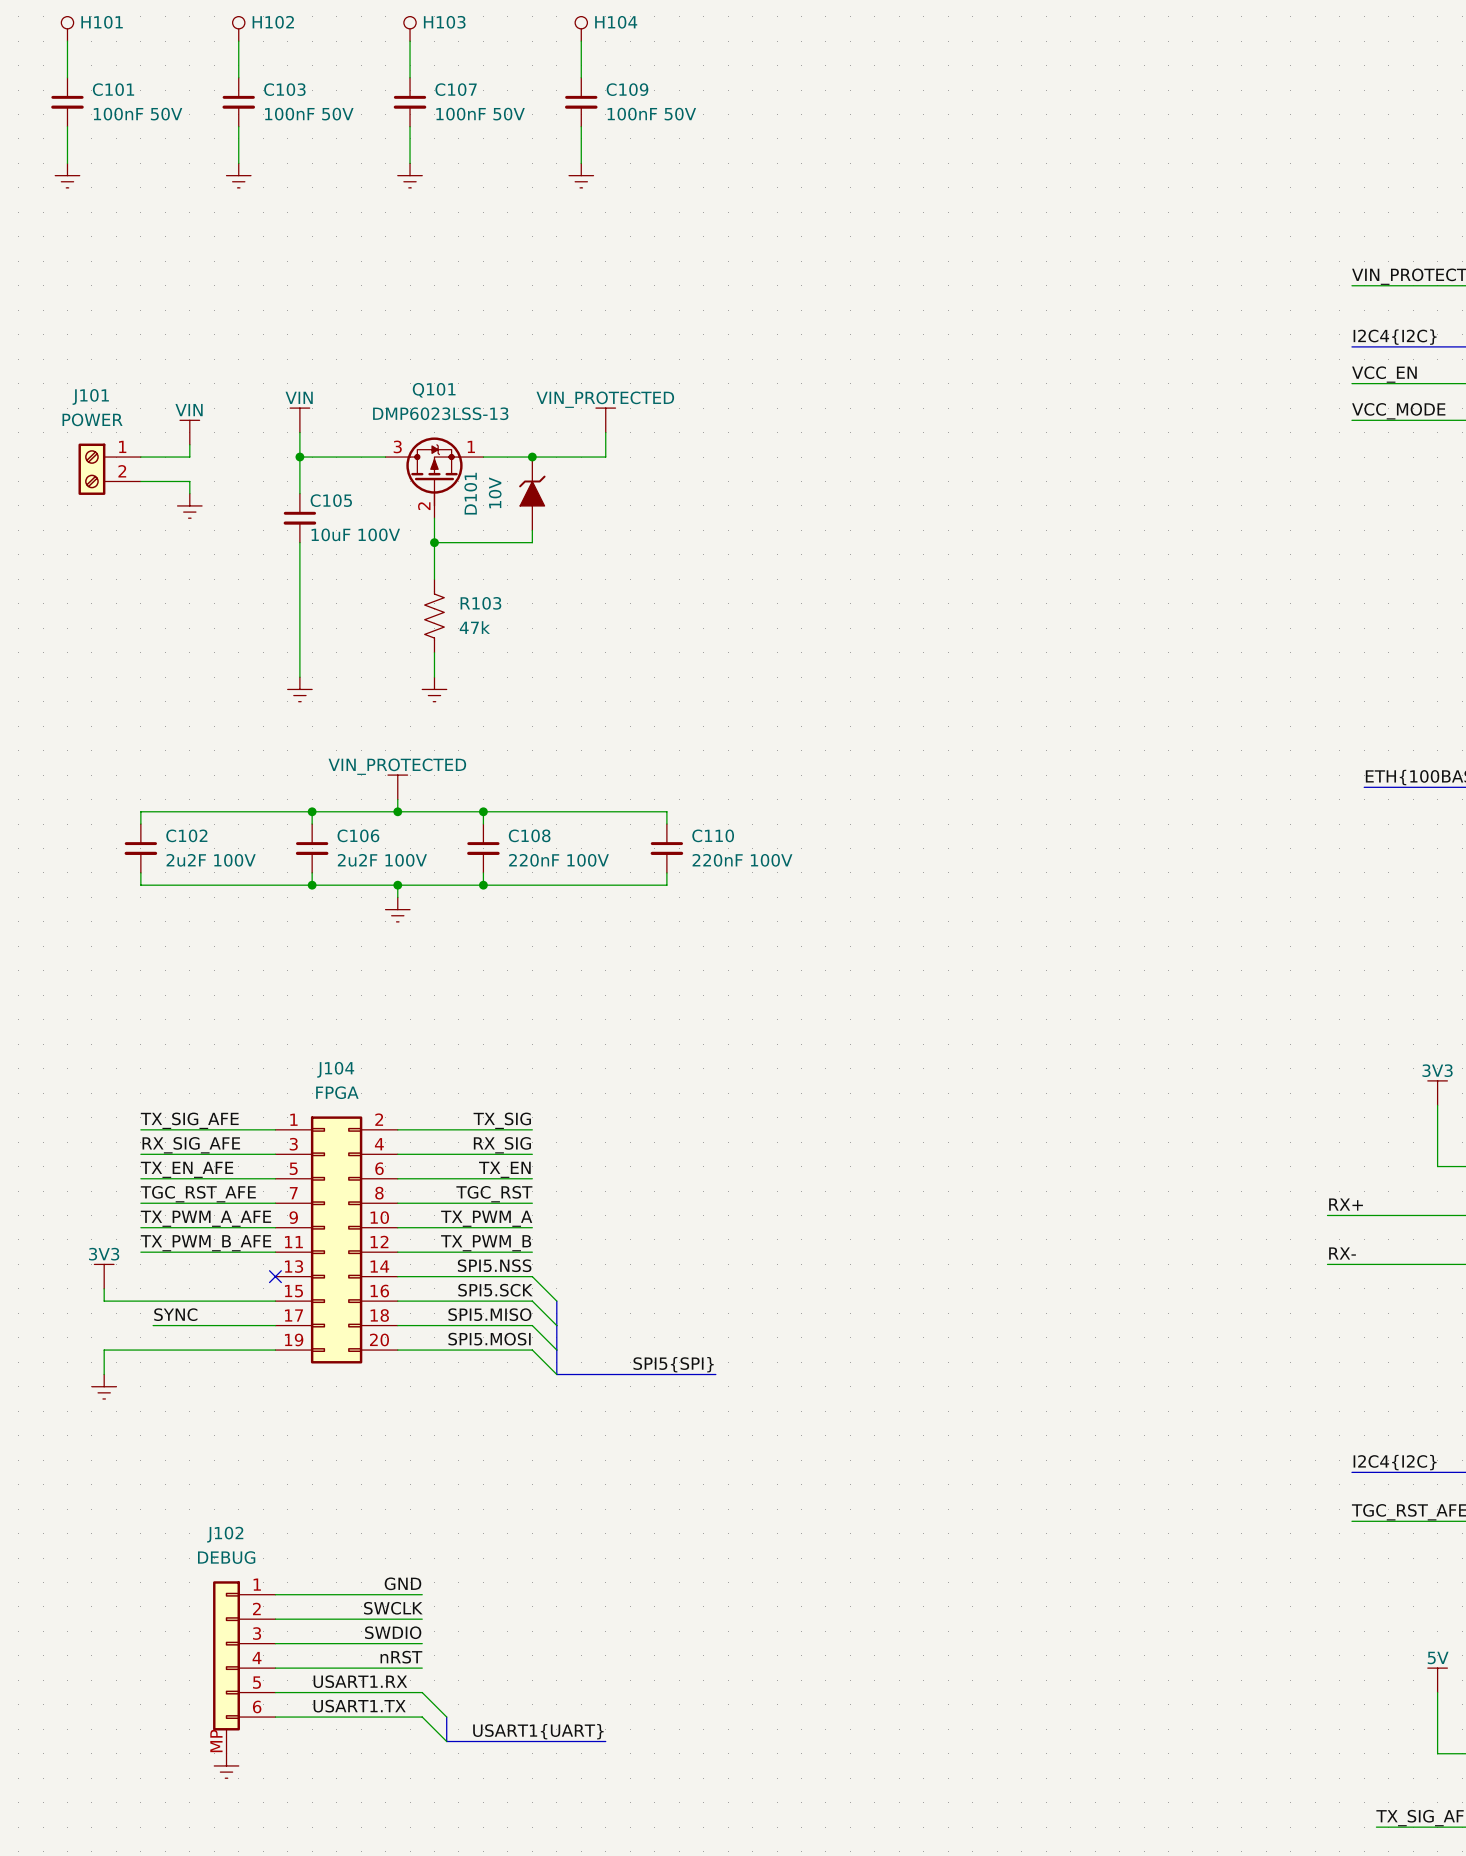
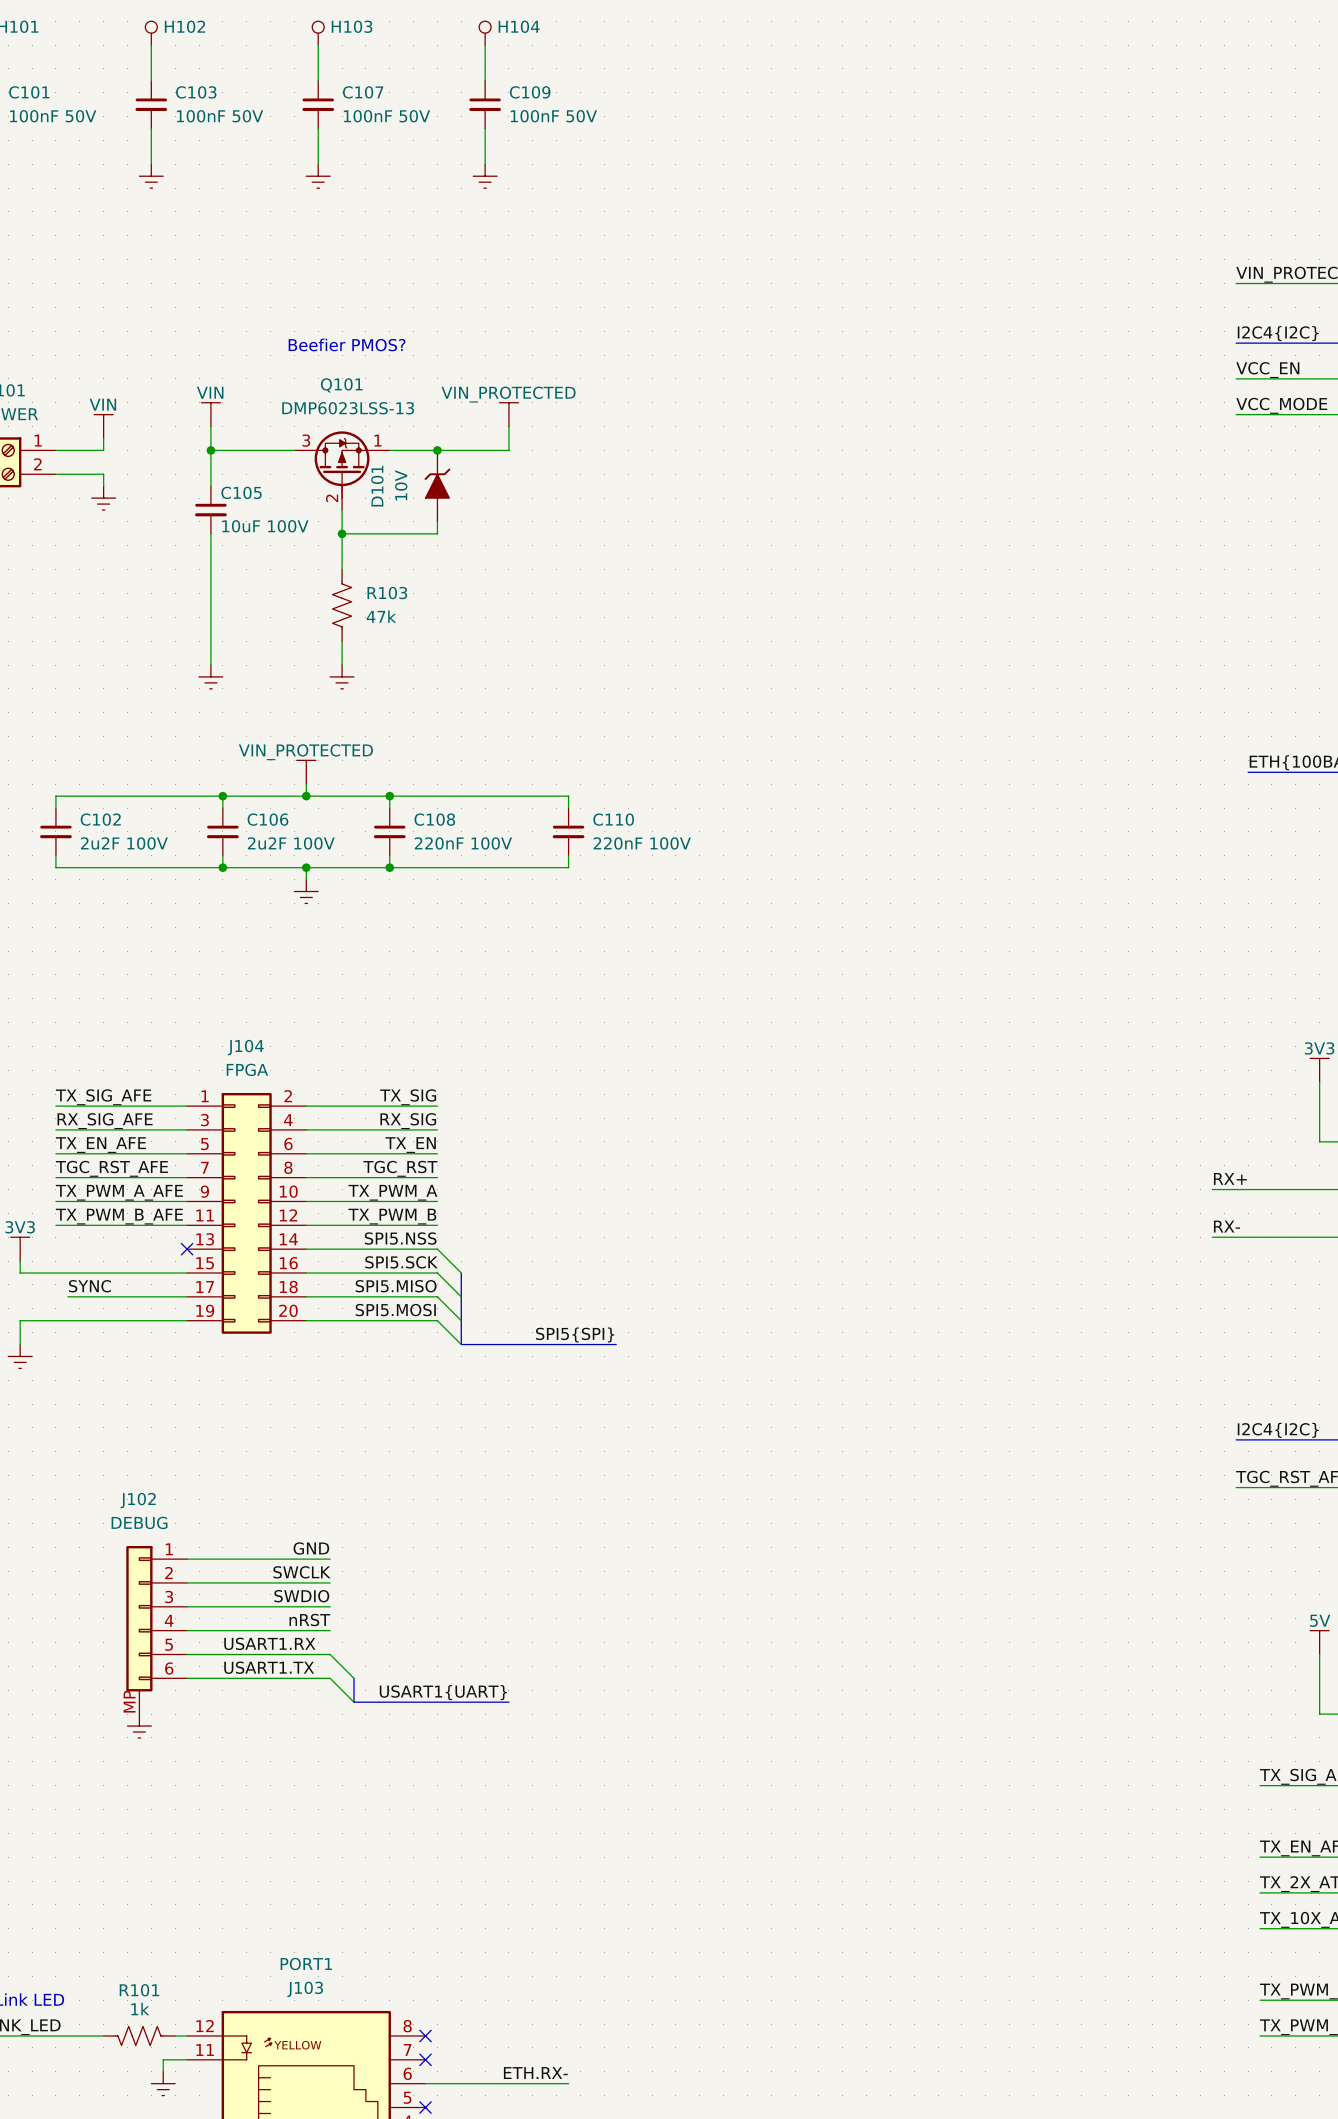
text: none -> Beefier PMOS? (347, 344)

